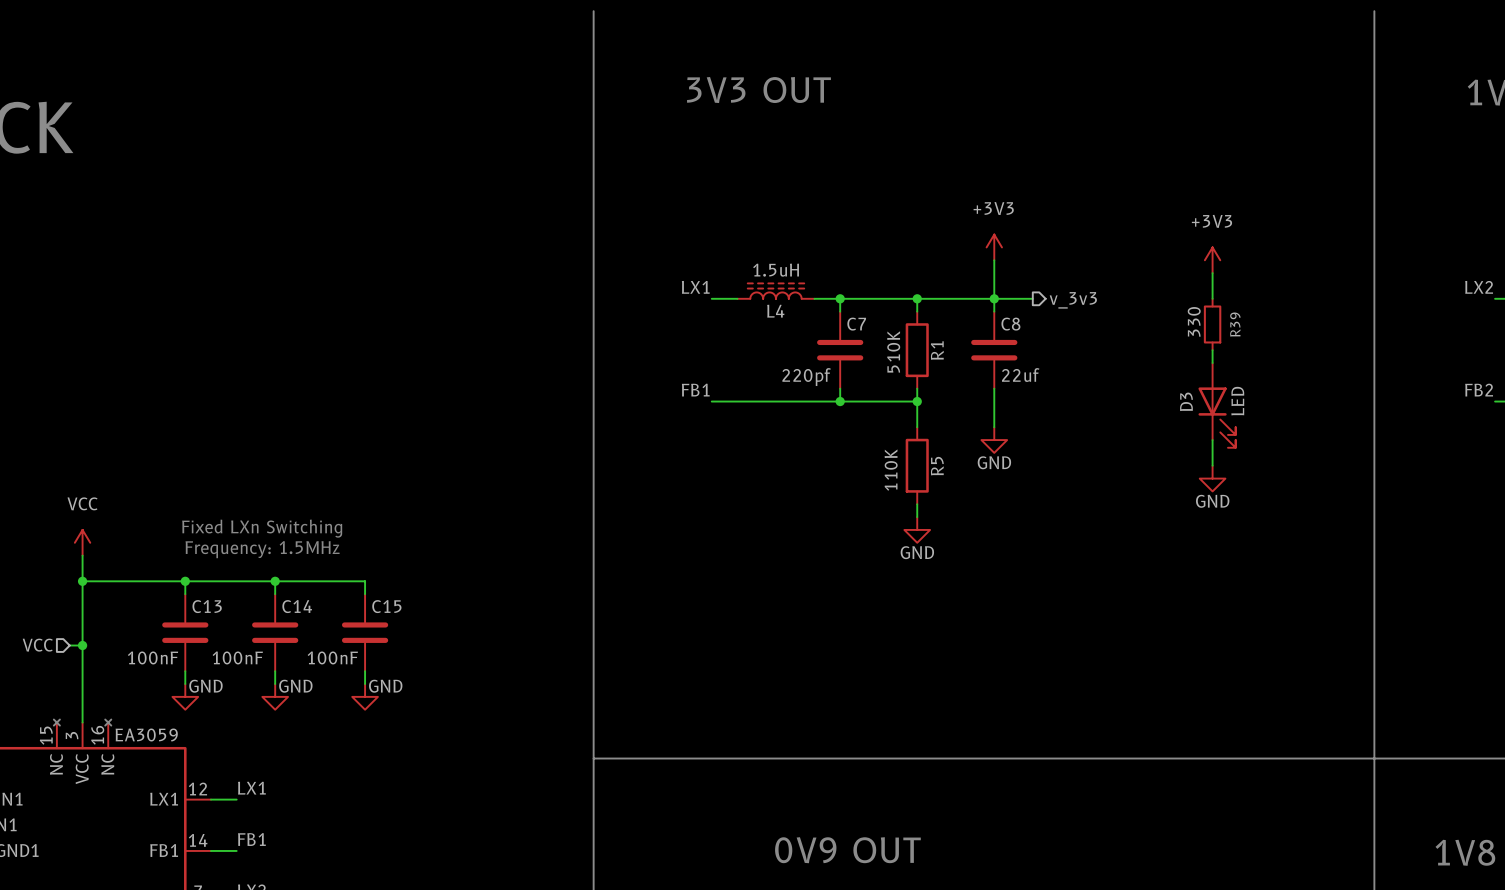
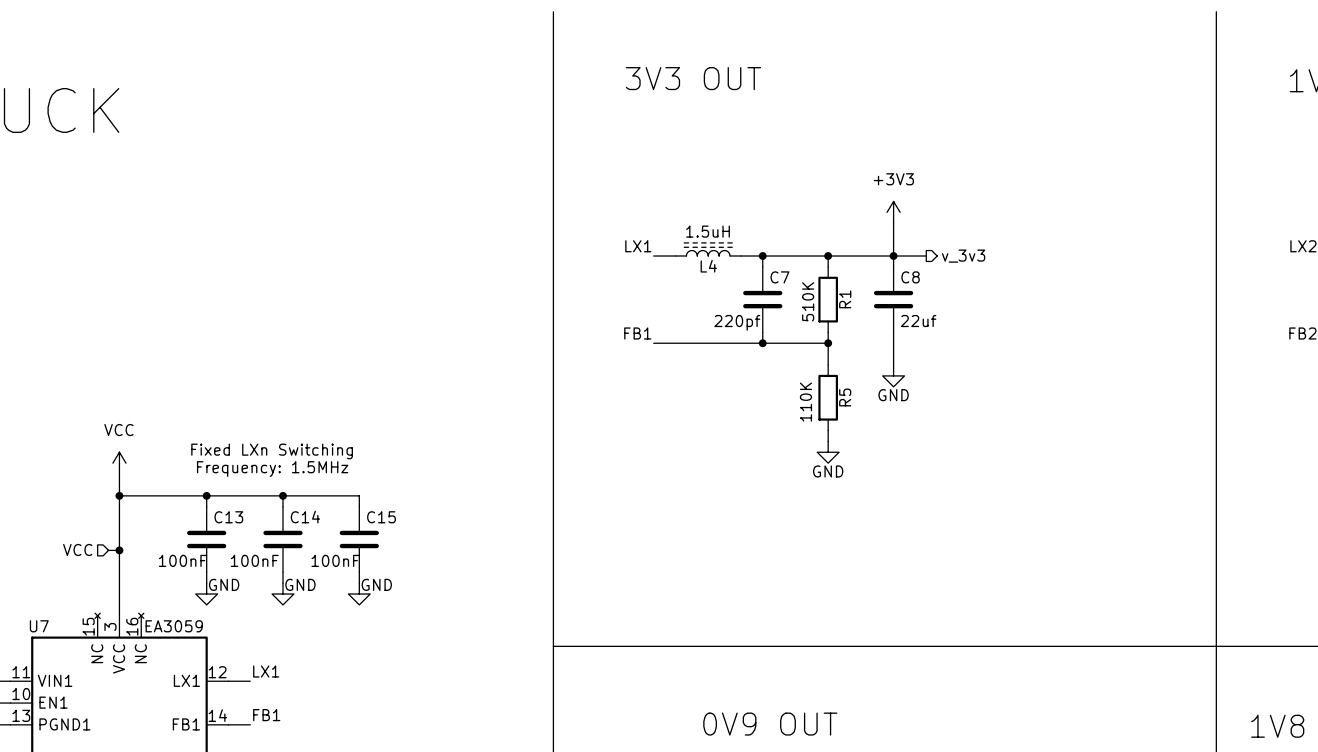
power symbol: +3V3 (1212, 260) -> none
wire: (1212, 273) (1212, 298) -> none
R39: 330 (1212, 324) -> none
wire: (1212, 350) (1212, 363) -> none
D3: LED (1217, 405) -> none
wire: (1212, 440) (1212, 465) -> none
power symbol: GND (1212, 478) -> none

